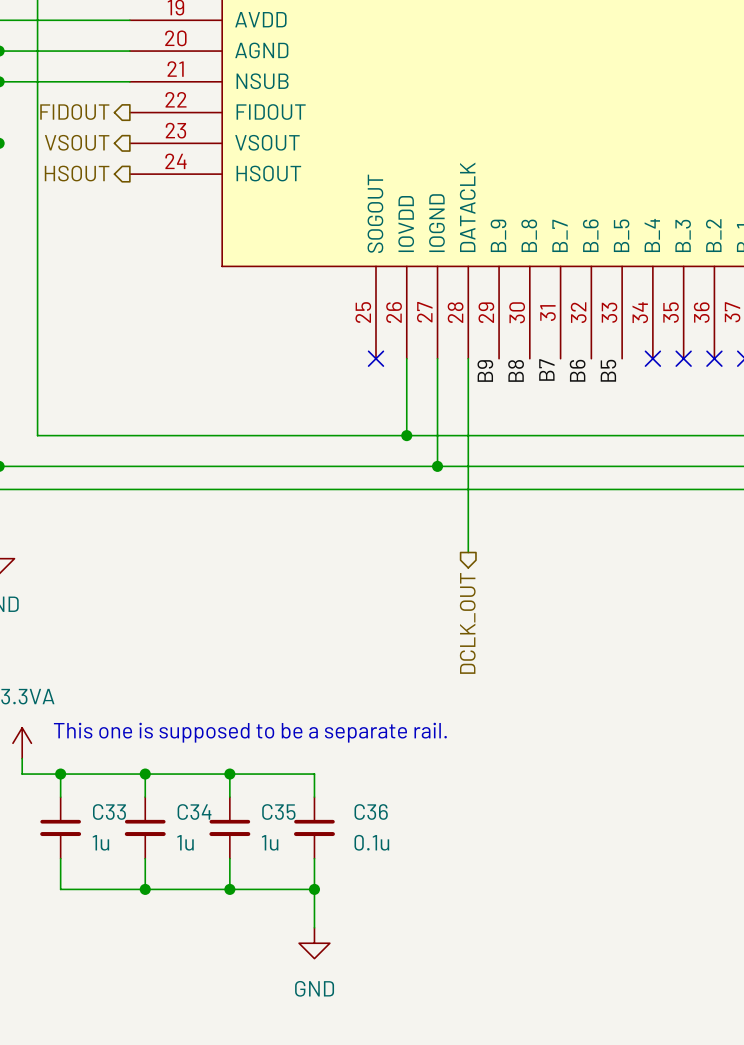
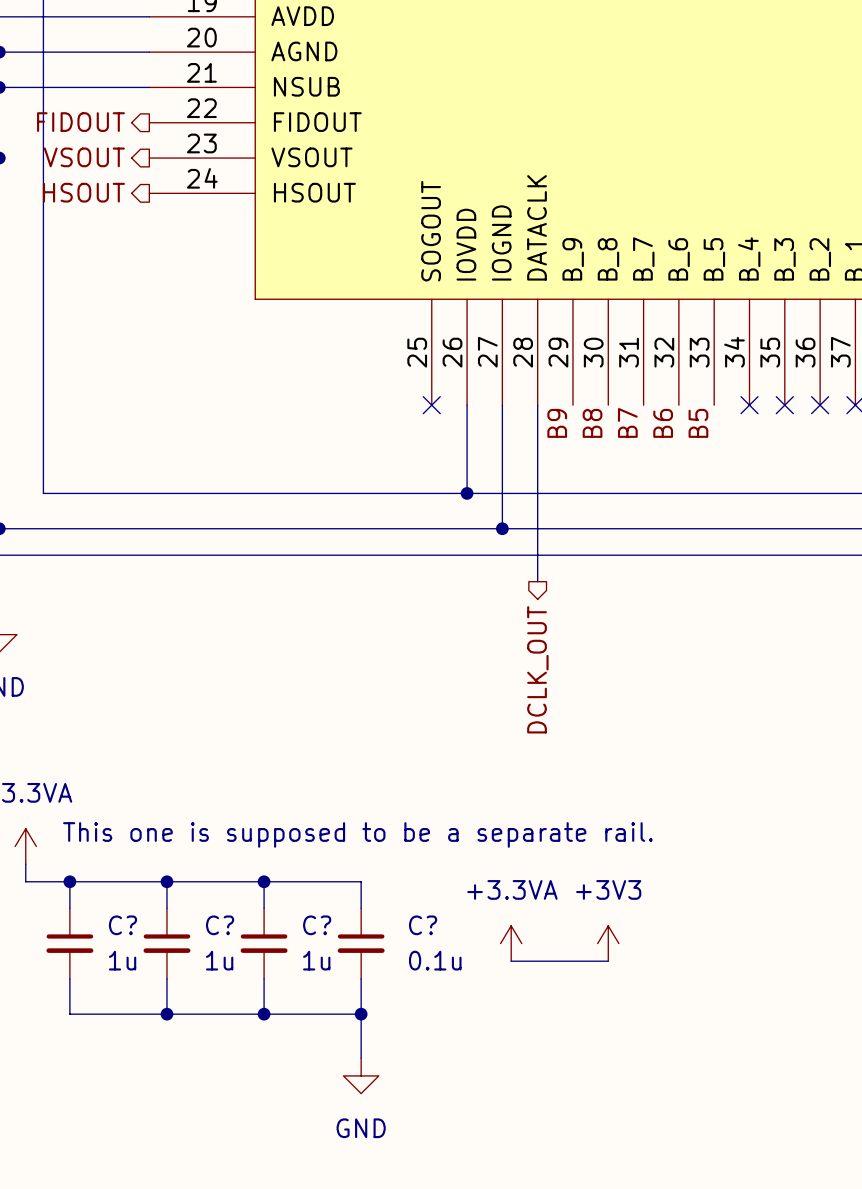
wire: (468, 512) (468, 552) -> none
hierarchical label position: DCLK_OUT (467, 623) -> DCLK_OUT (537, 669)
C33 name: C33 (109, 812) -> C? (122, 925)
C34 name: C34 (194, 812) -> C? (220, 925)
C35 name: C35 (278, 812) -> C? (317, 925)
C36 name: C36 (371, 812) -> C? (423, 925)
power symbol: none -> +3.3VA (511, 943)
power symbol: none -> +3V3 (608, 943)
wire: none -> (511, 961) (608, 961)

